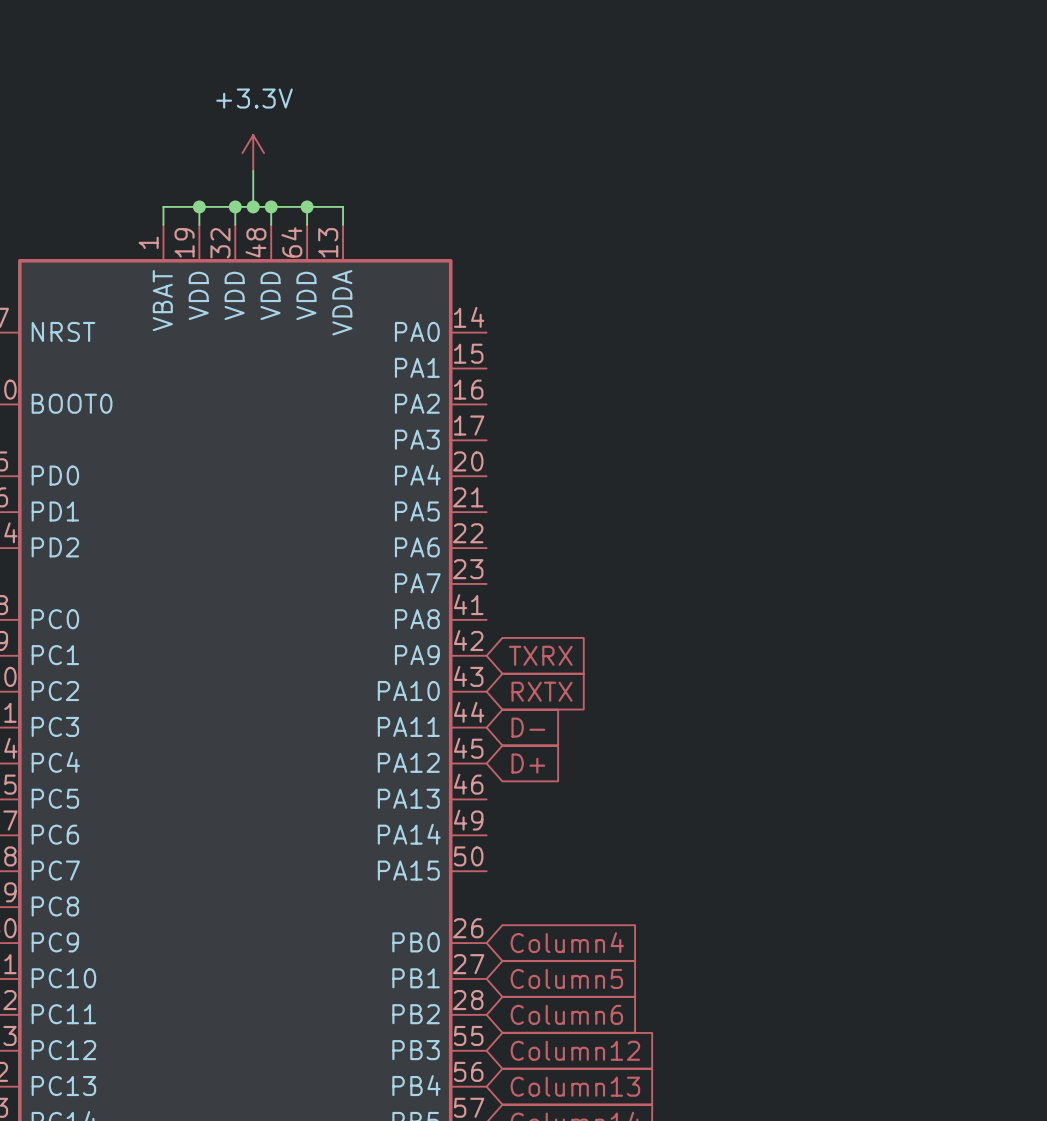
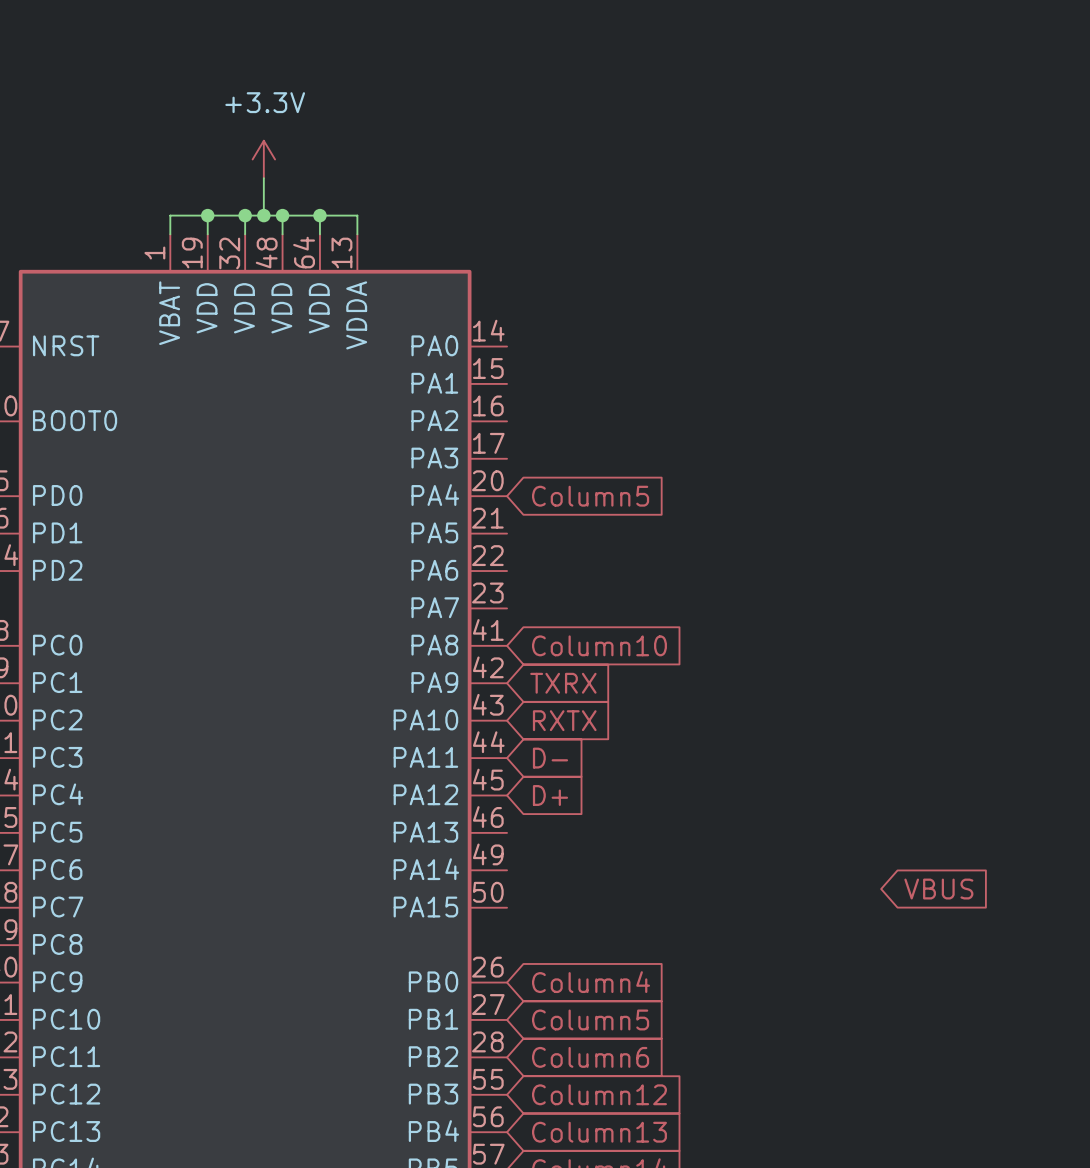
global label: none -> Column5 (590, 496)
global label: none -> Column10 (599, 645)
global label: none -> VBUS (938, 889)

